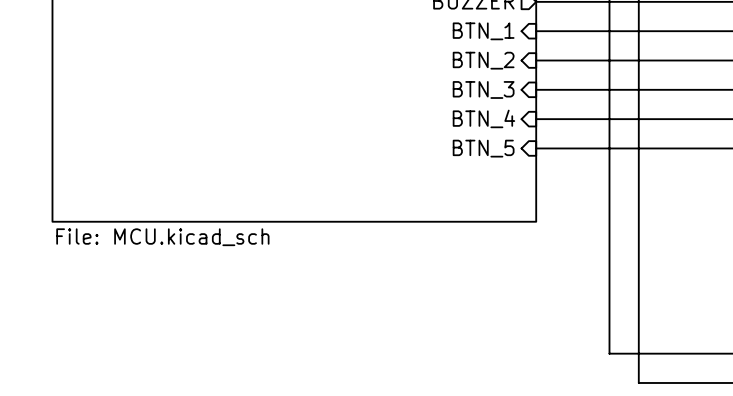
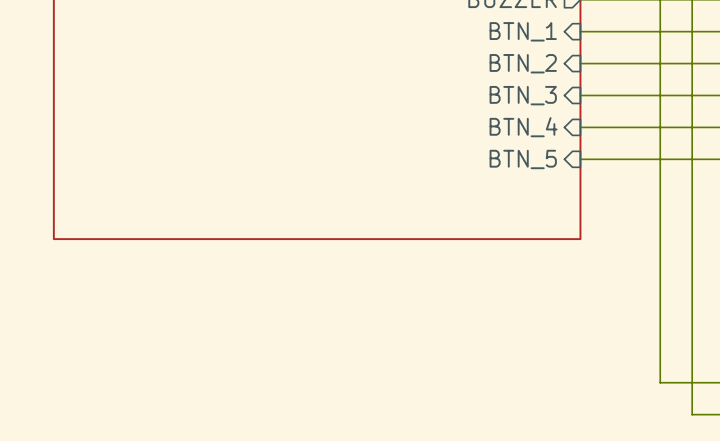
sheet value: File: MCU.kicad_sch (162, 237) -> none

